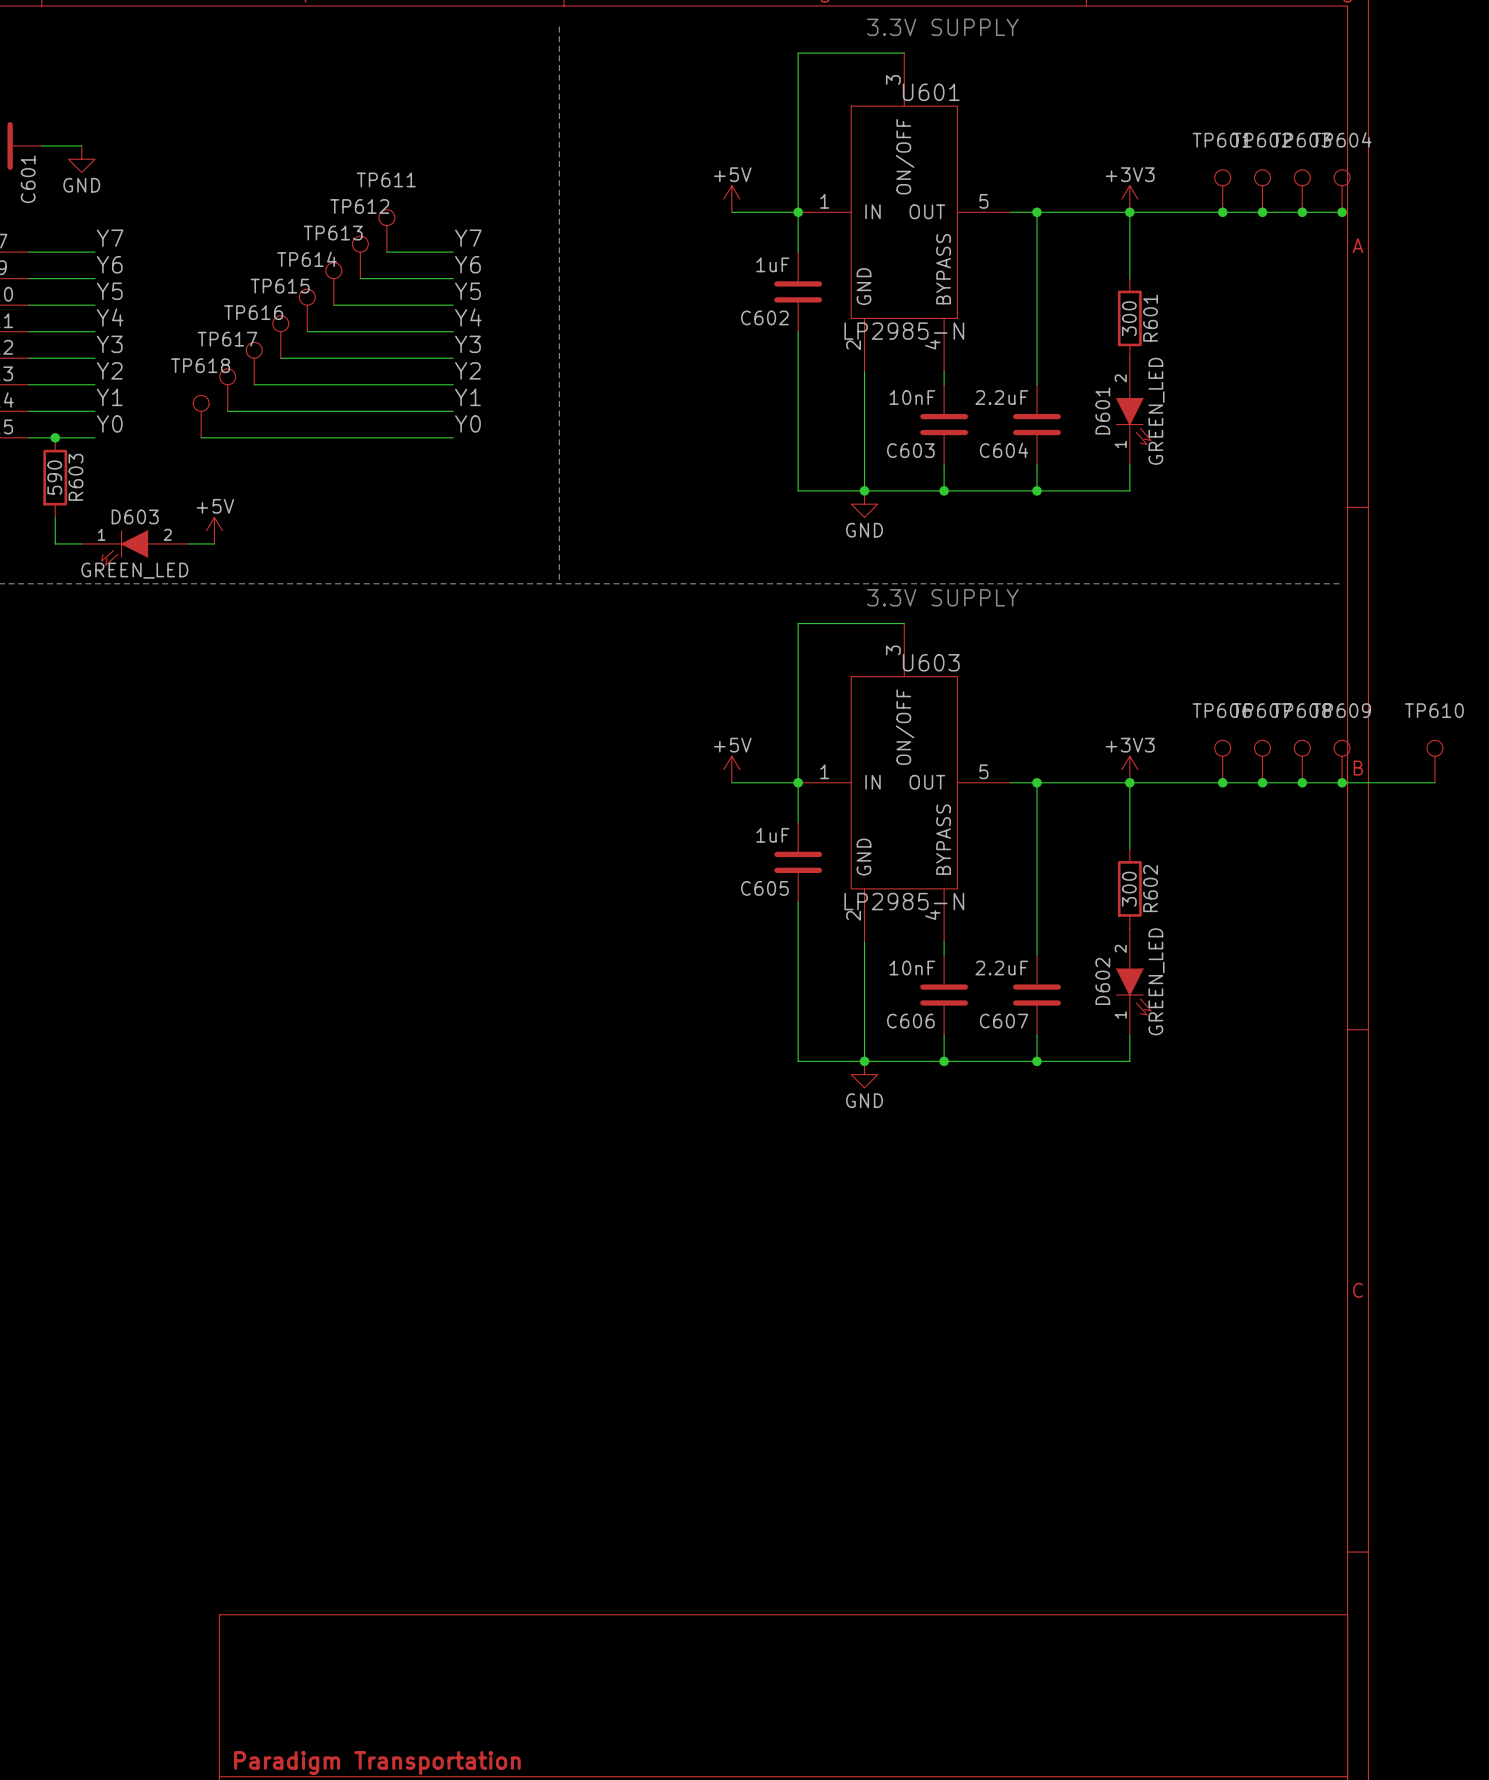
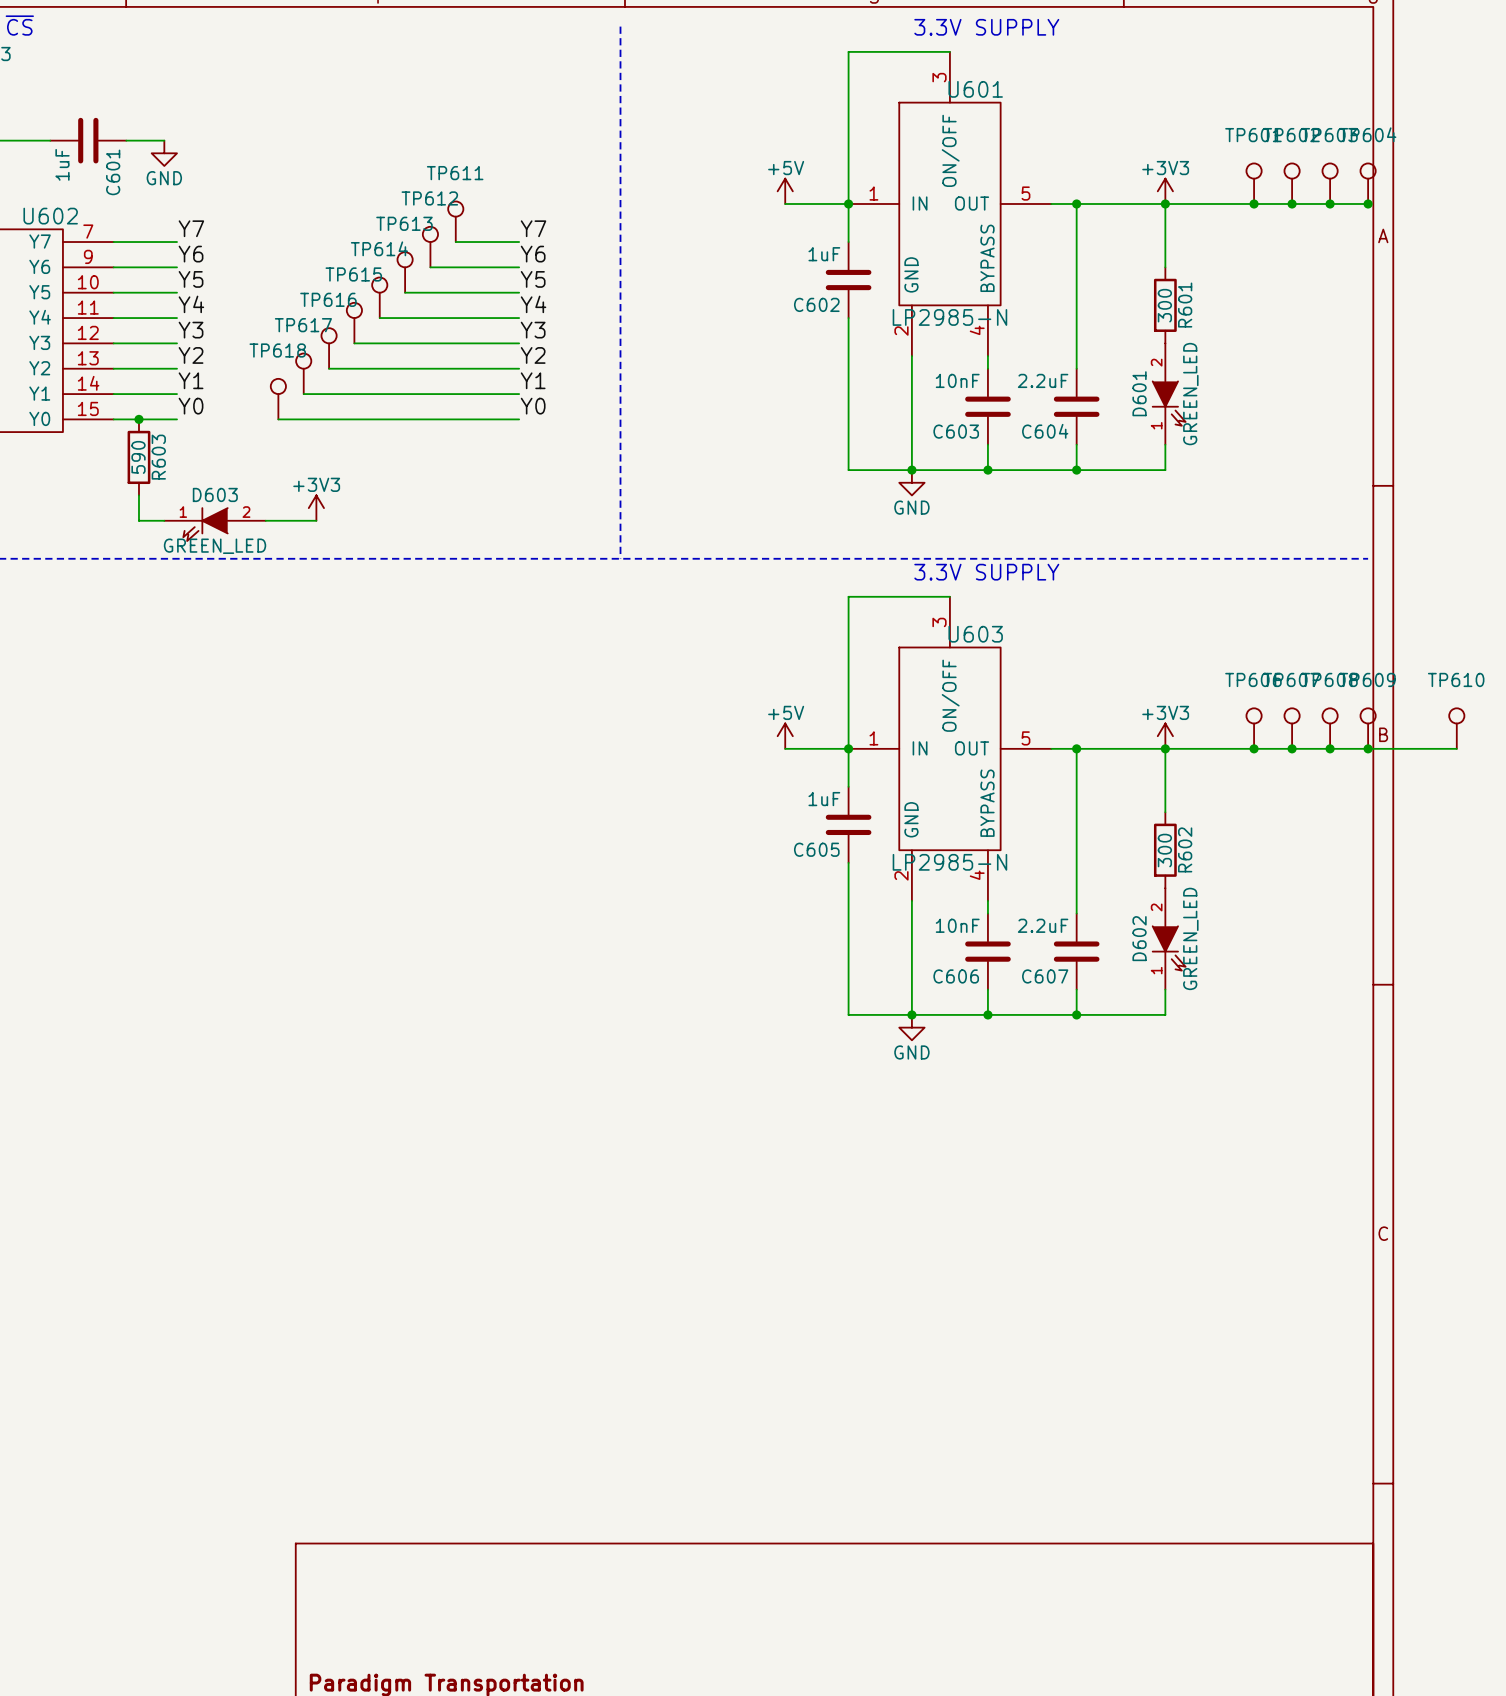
power symbol: +5V (214, 530) -> none
power symbol: none -> +3V3 (316, 508)
wire: none -> (291, 520) (316, 520)

